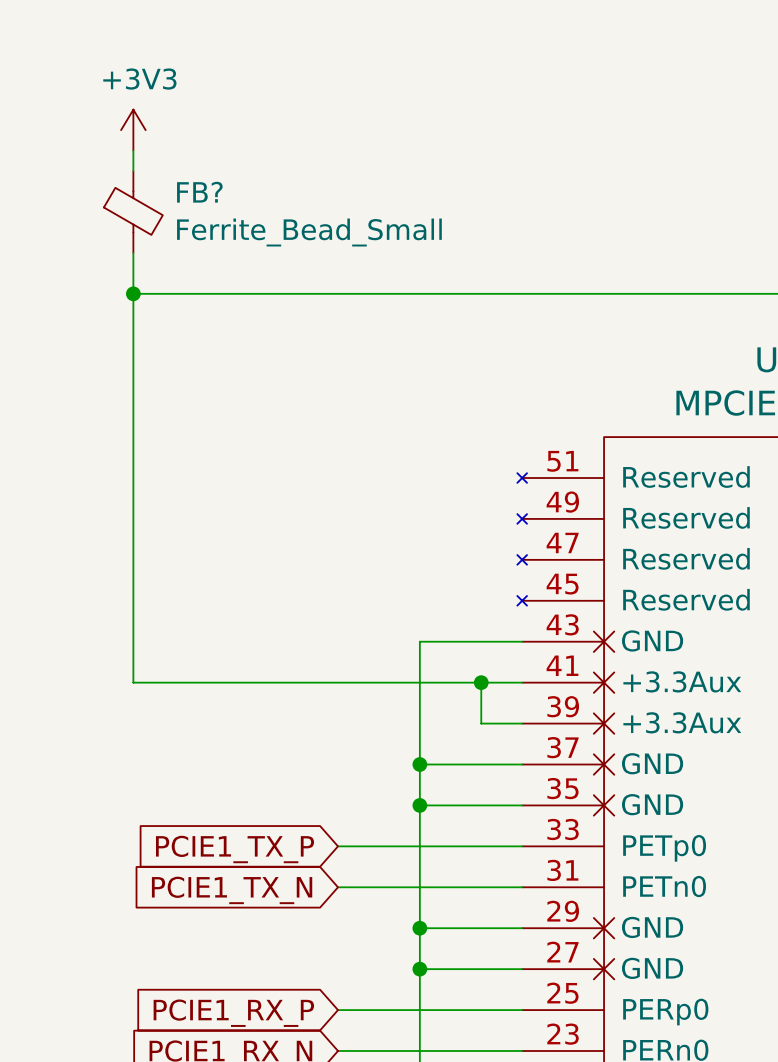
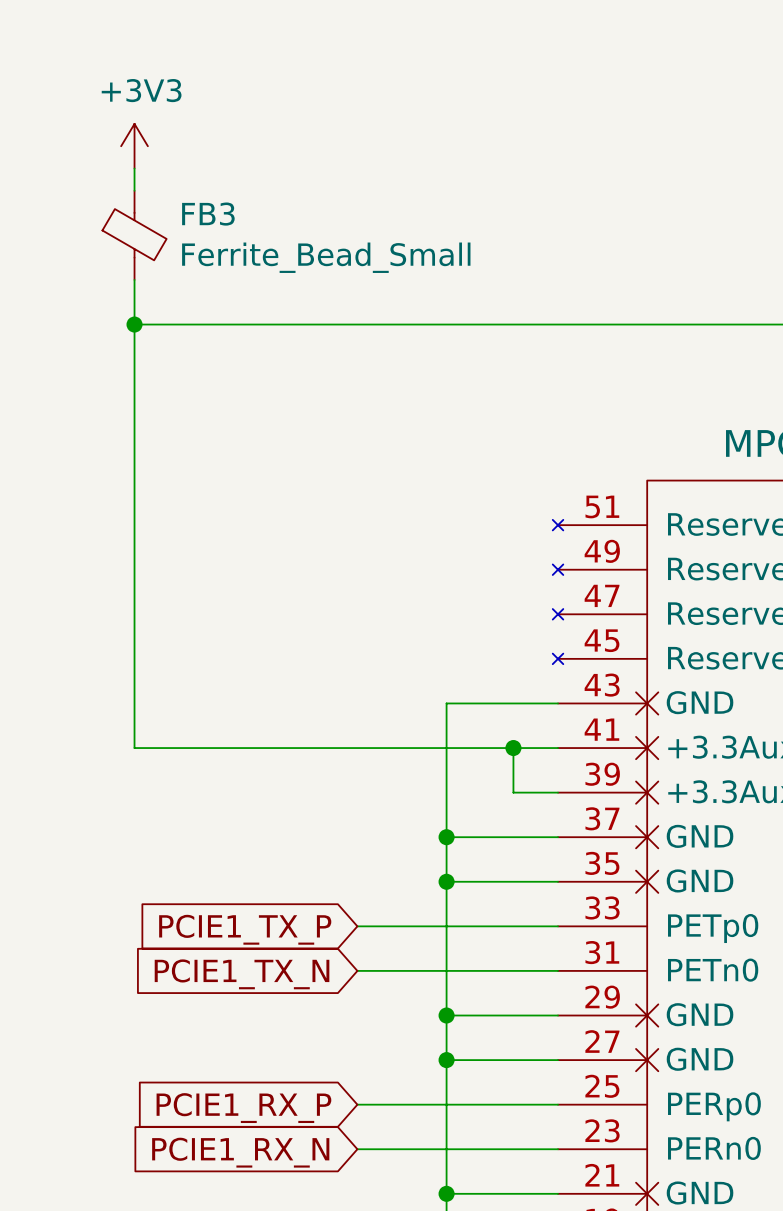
FB? name: FB? (199, 192) -> FB3 (208, 214)

